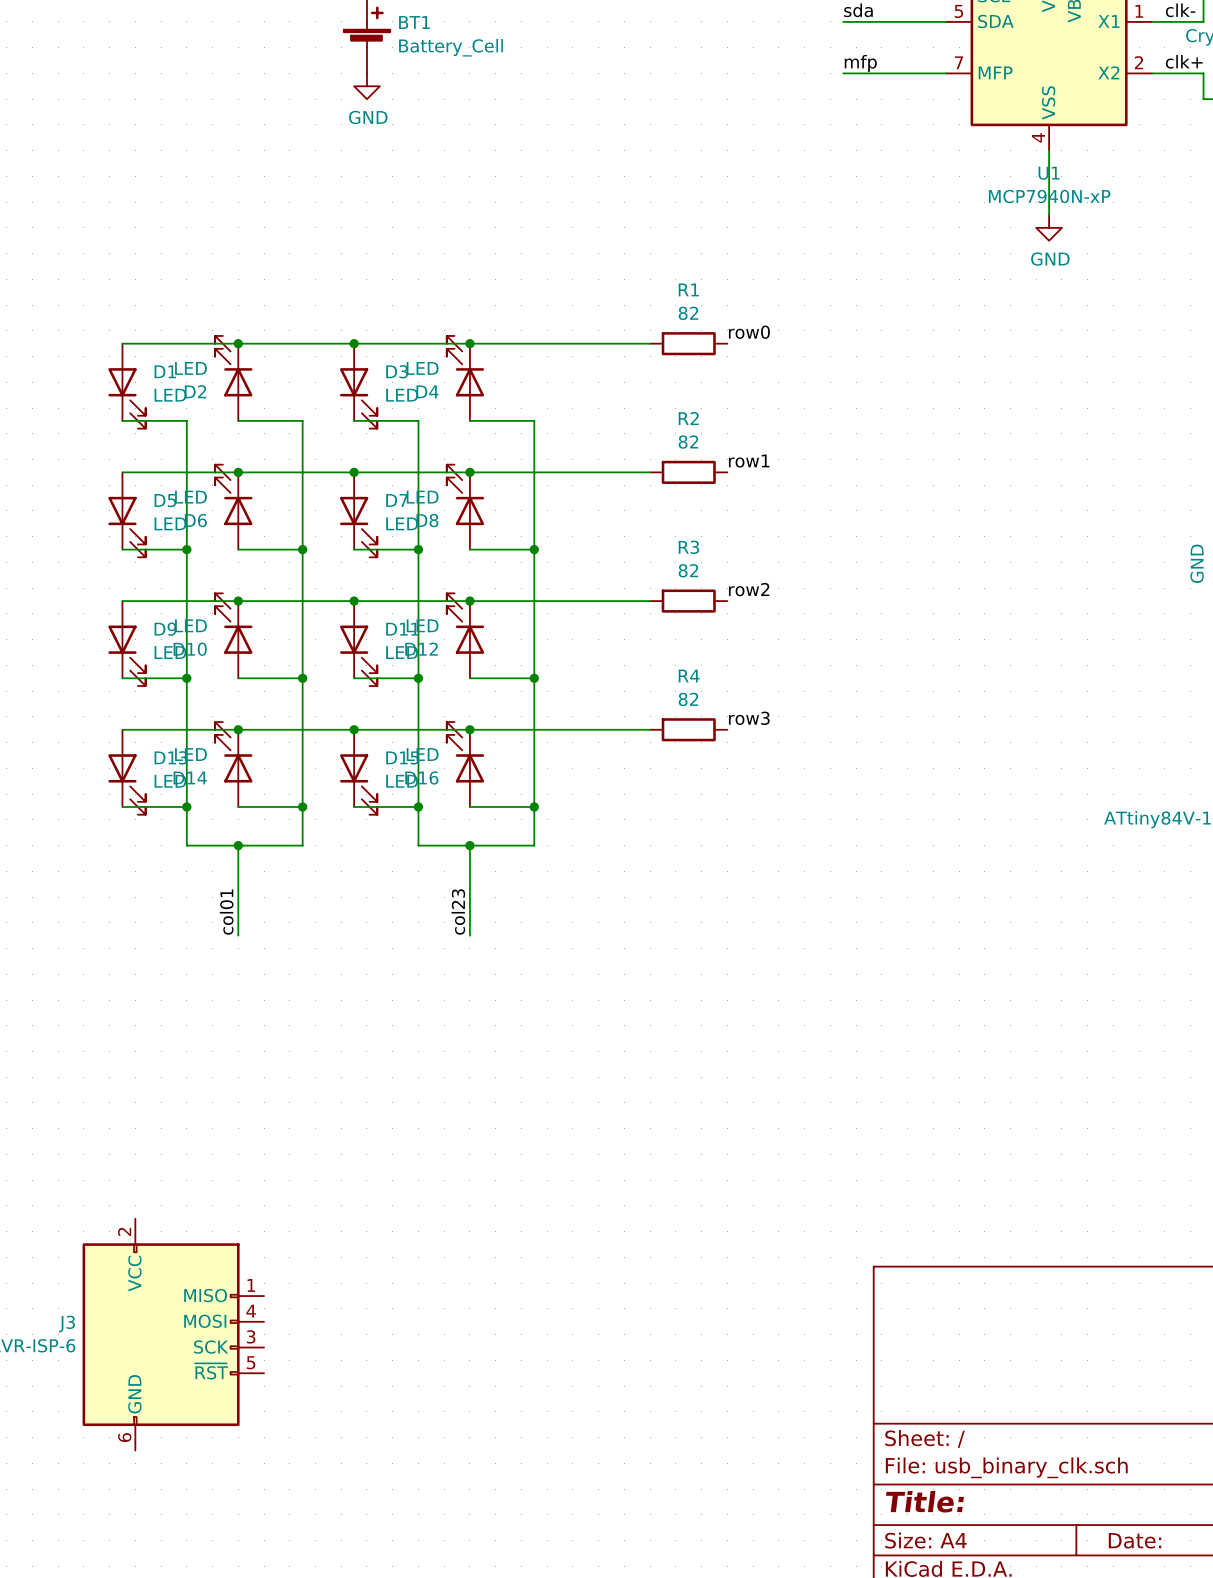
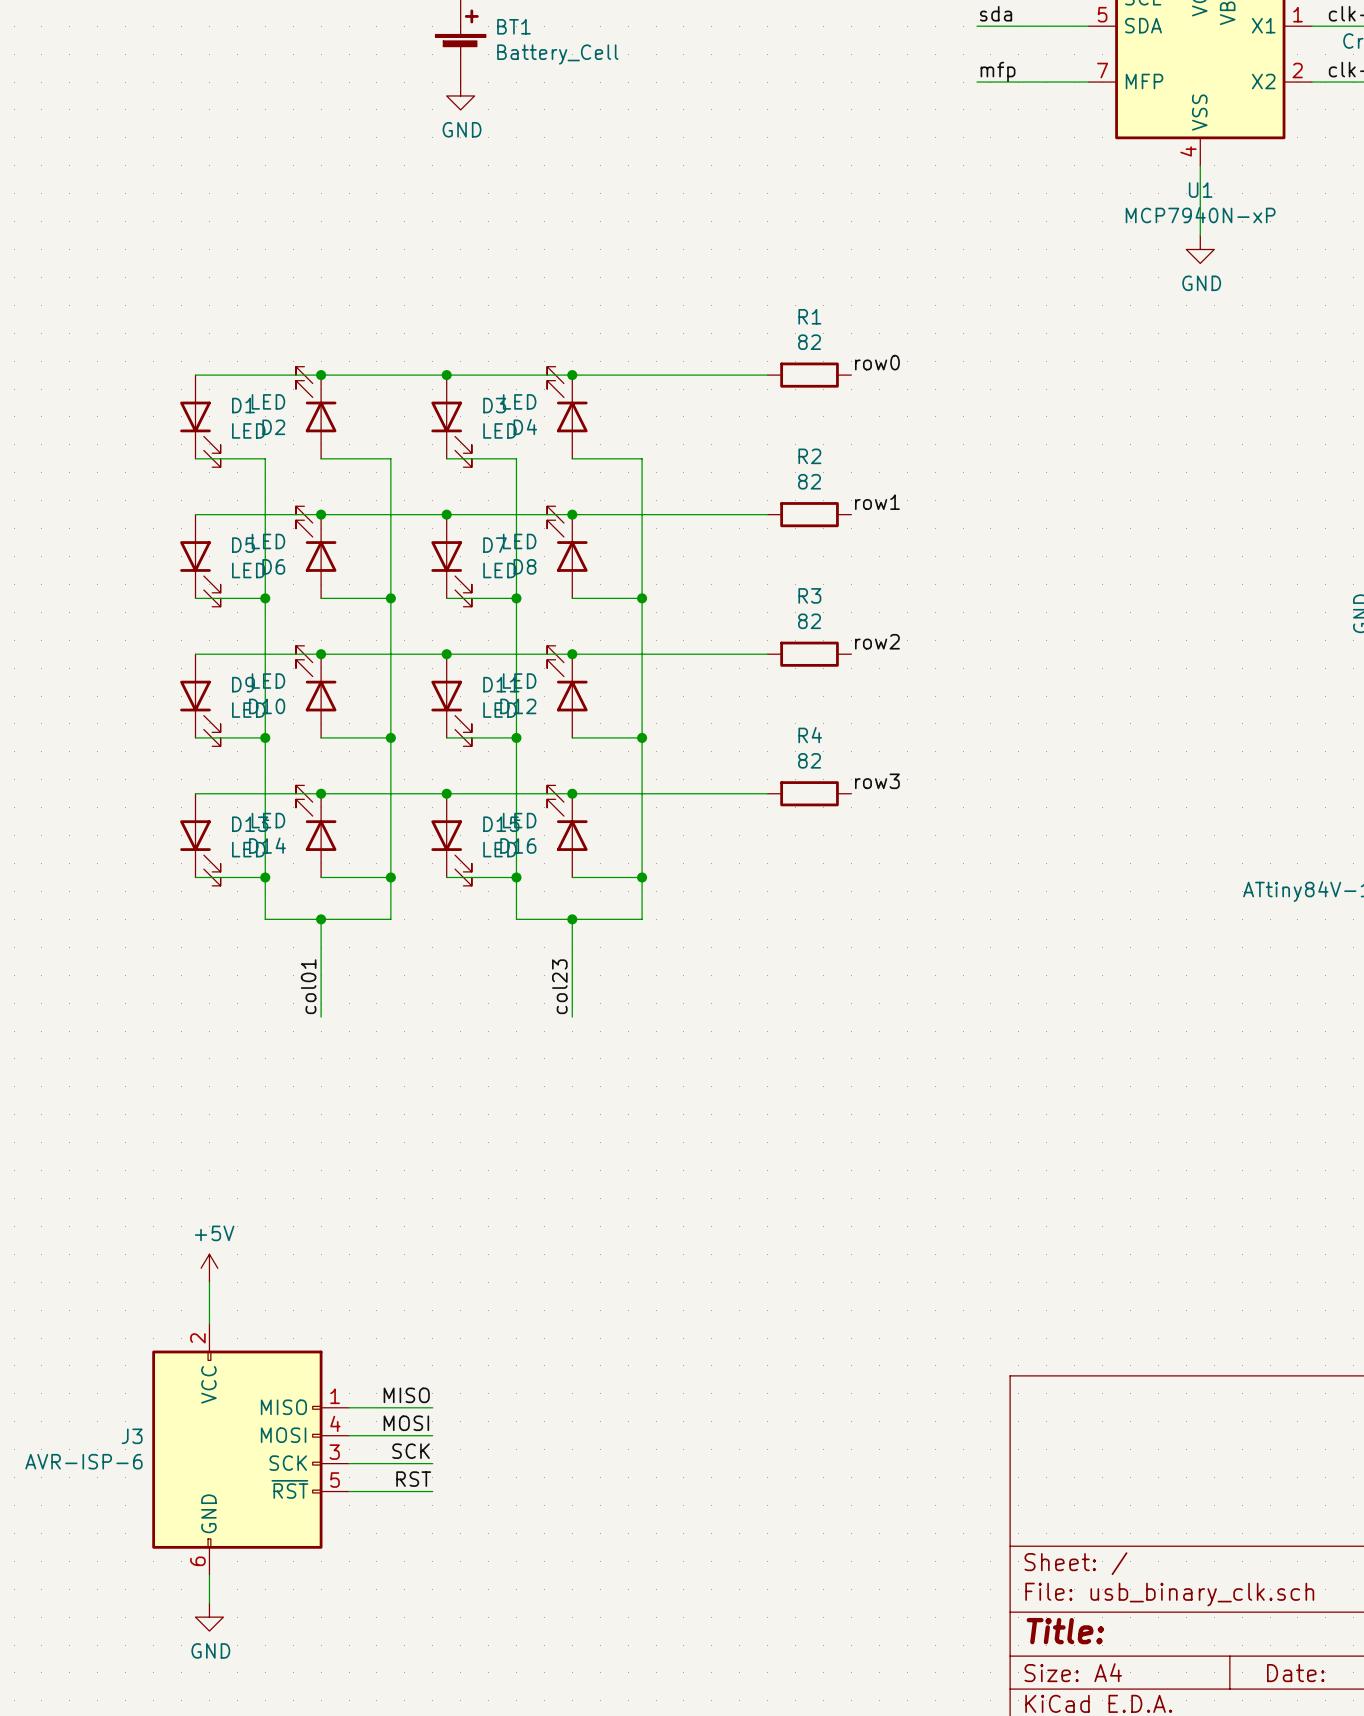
power symbol: none -> +5V (209, 1268)
wire: none -> (209, 1282) (209, 1324)
label: none -> MISO (406, 1395)
wire: none -> (349, 1407) (432, 1407)
label: none -> MOSI (406, 1423)
wire: none -> (349, 1435) (432, 1435)
label: none -> SCK (411, 1451)
wire: none -> (349, 1463) (432, 1463)
label: none -> RST (413, 1479)
wire: none -> (349, 1491) (432, 1491)
wire: none -> (209, 1575) (209, 1603)
power symbol: none -> GND (209, 1617)

